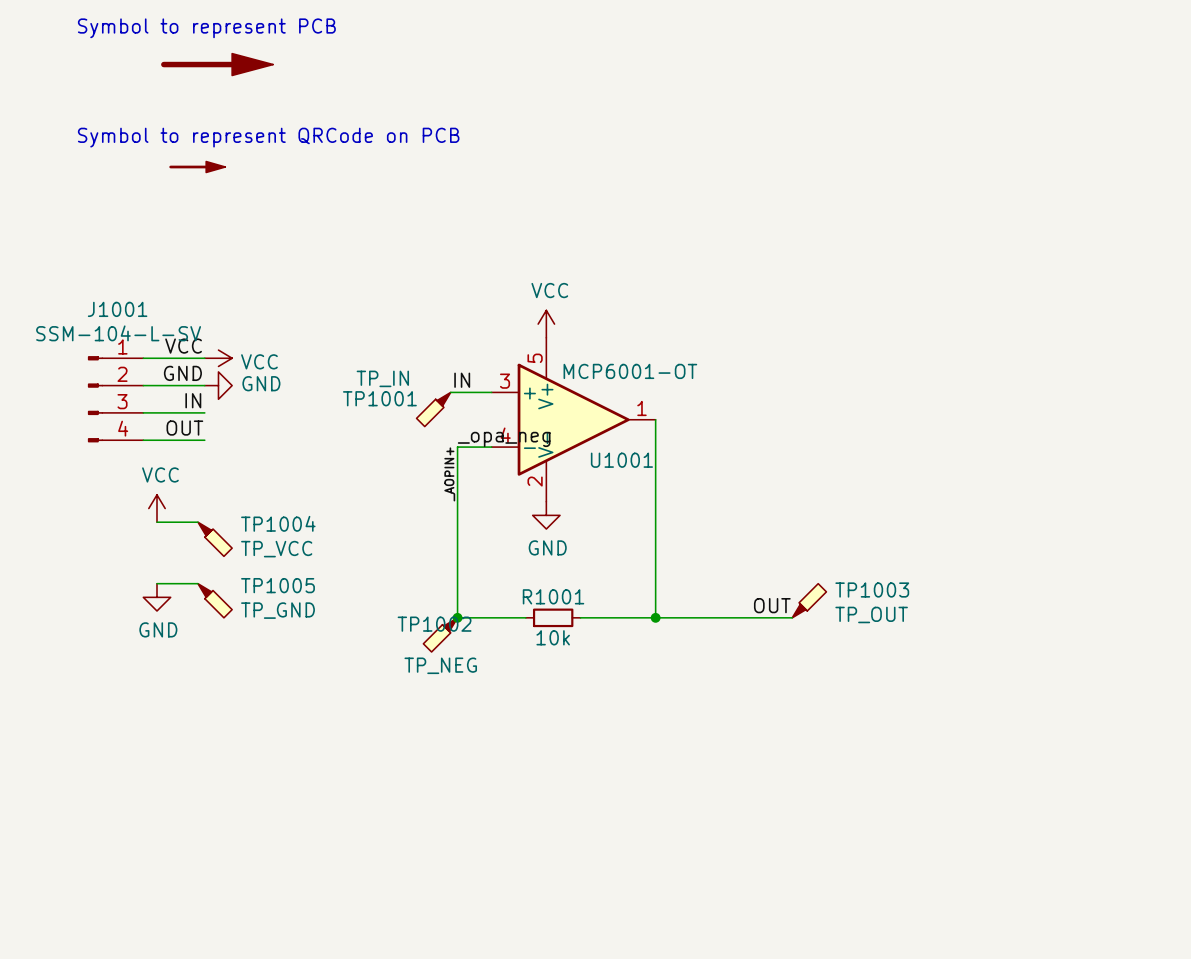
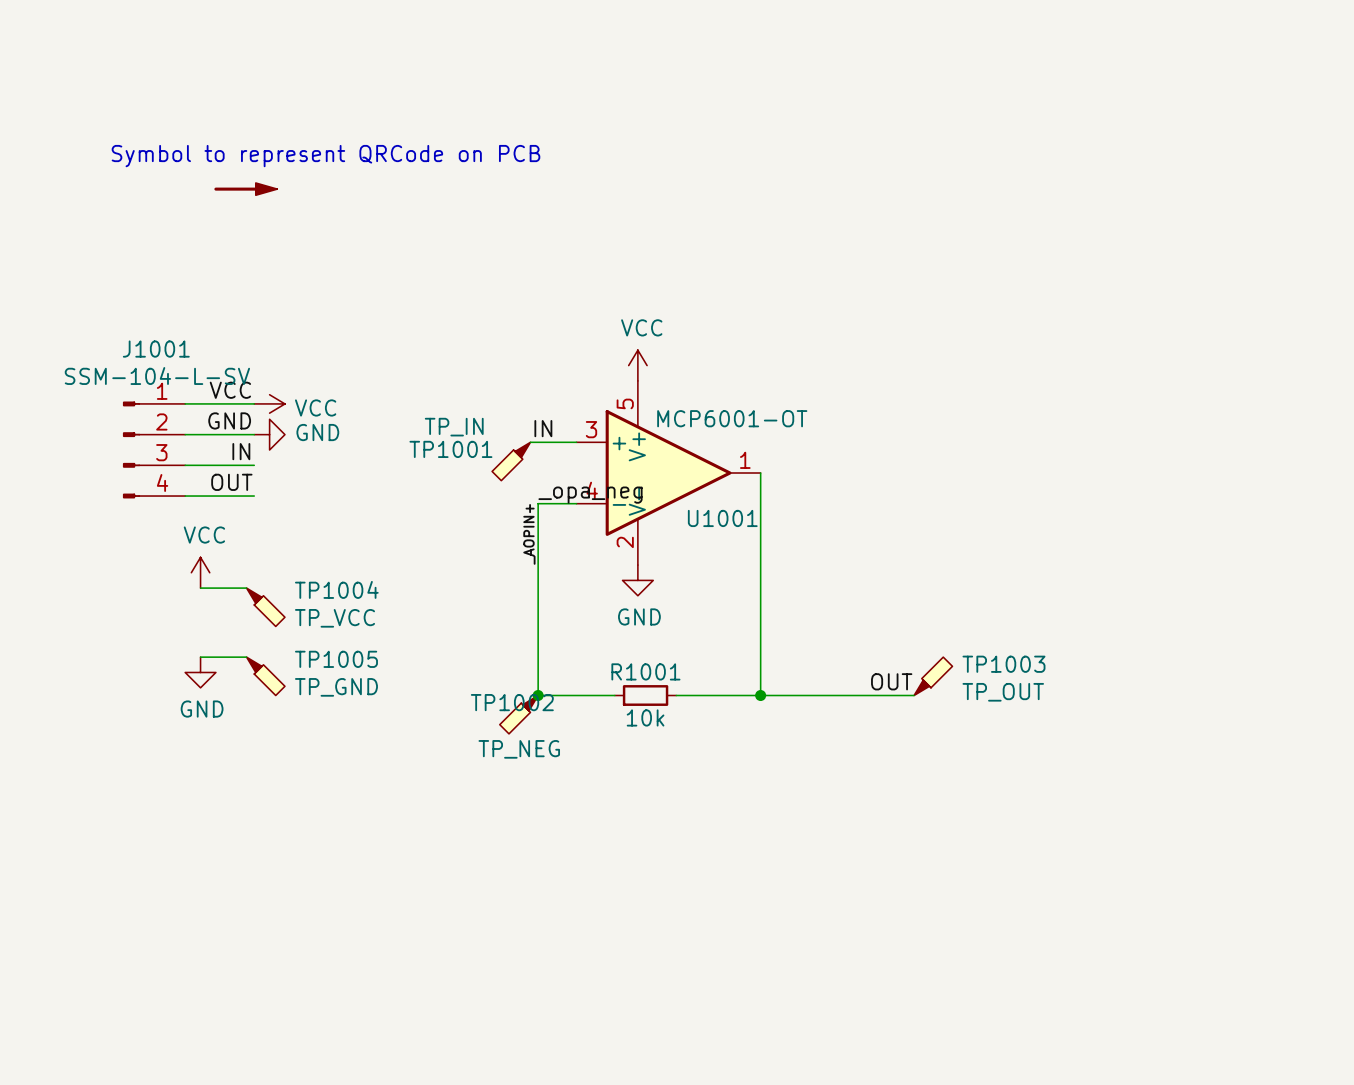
text: Symbol to represent PCB (206, 28) -> none
part: (217, 64) -> none

